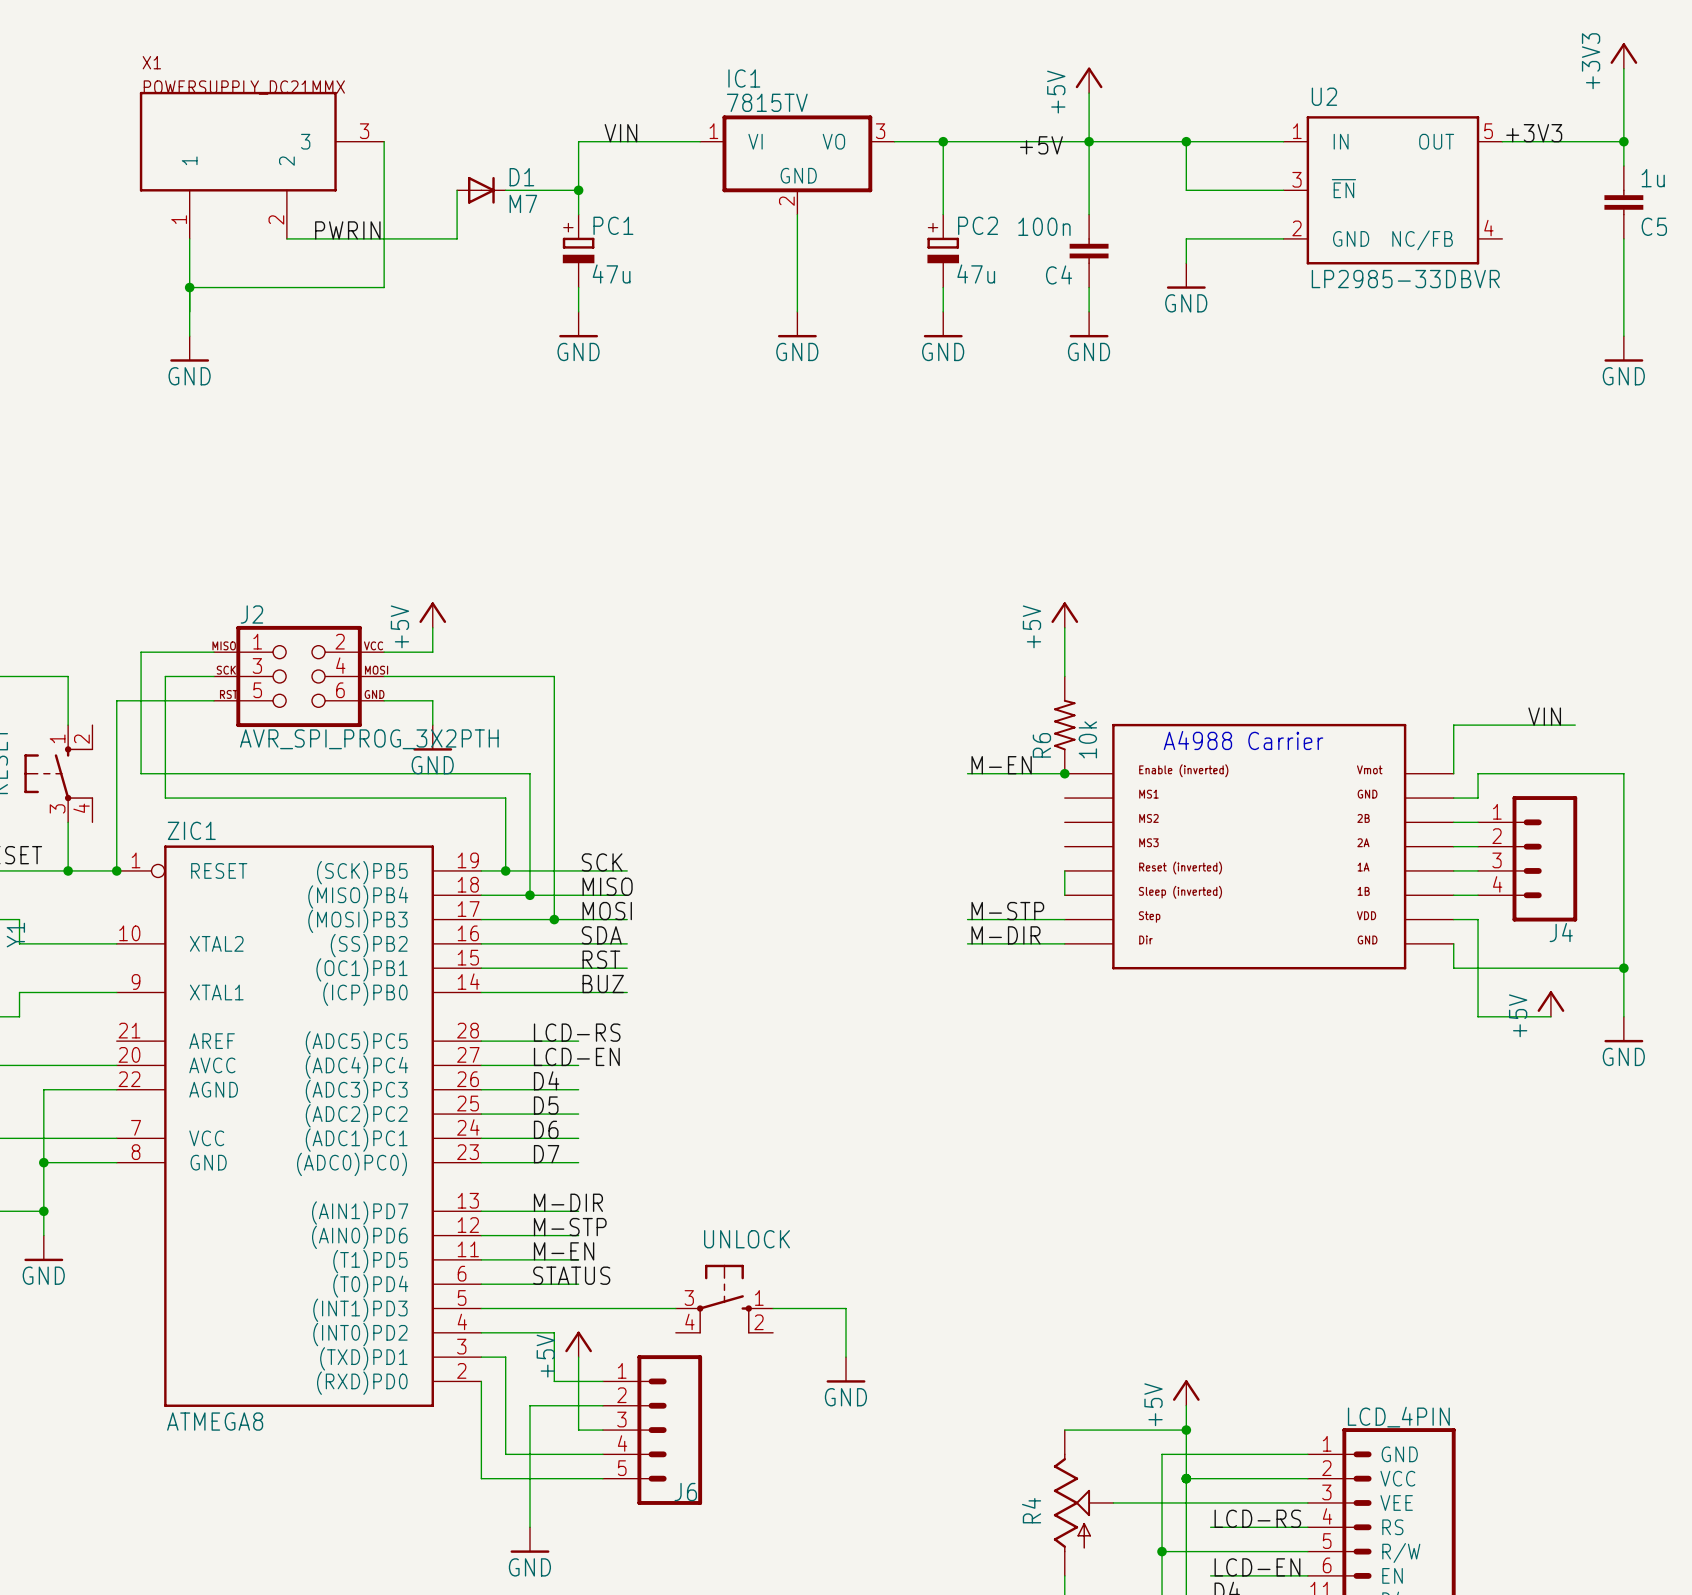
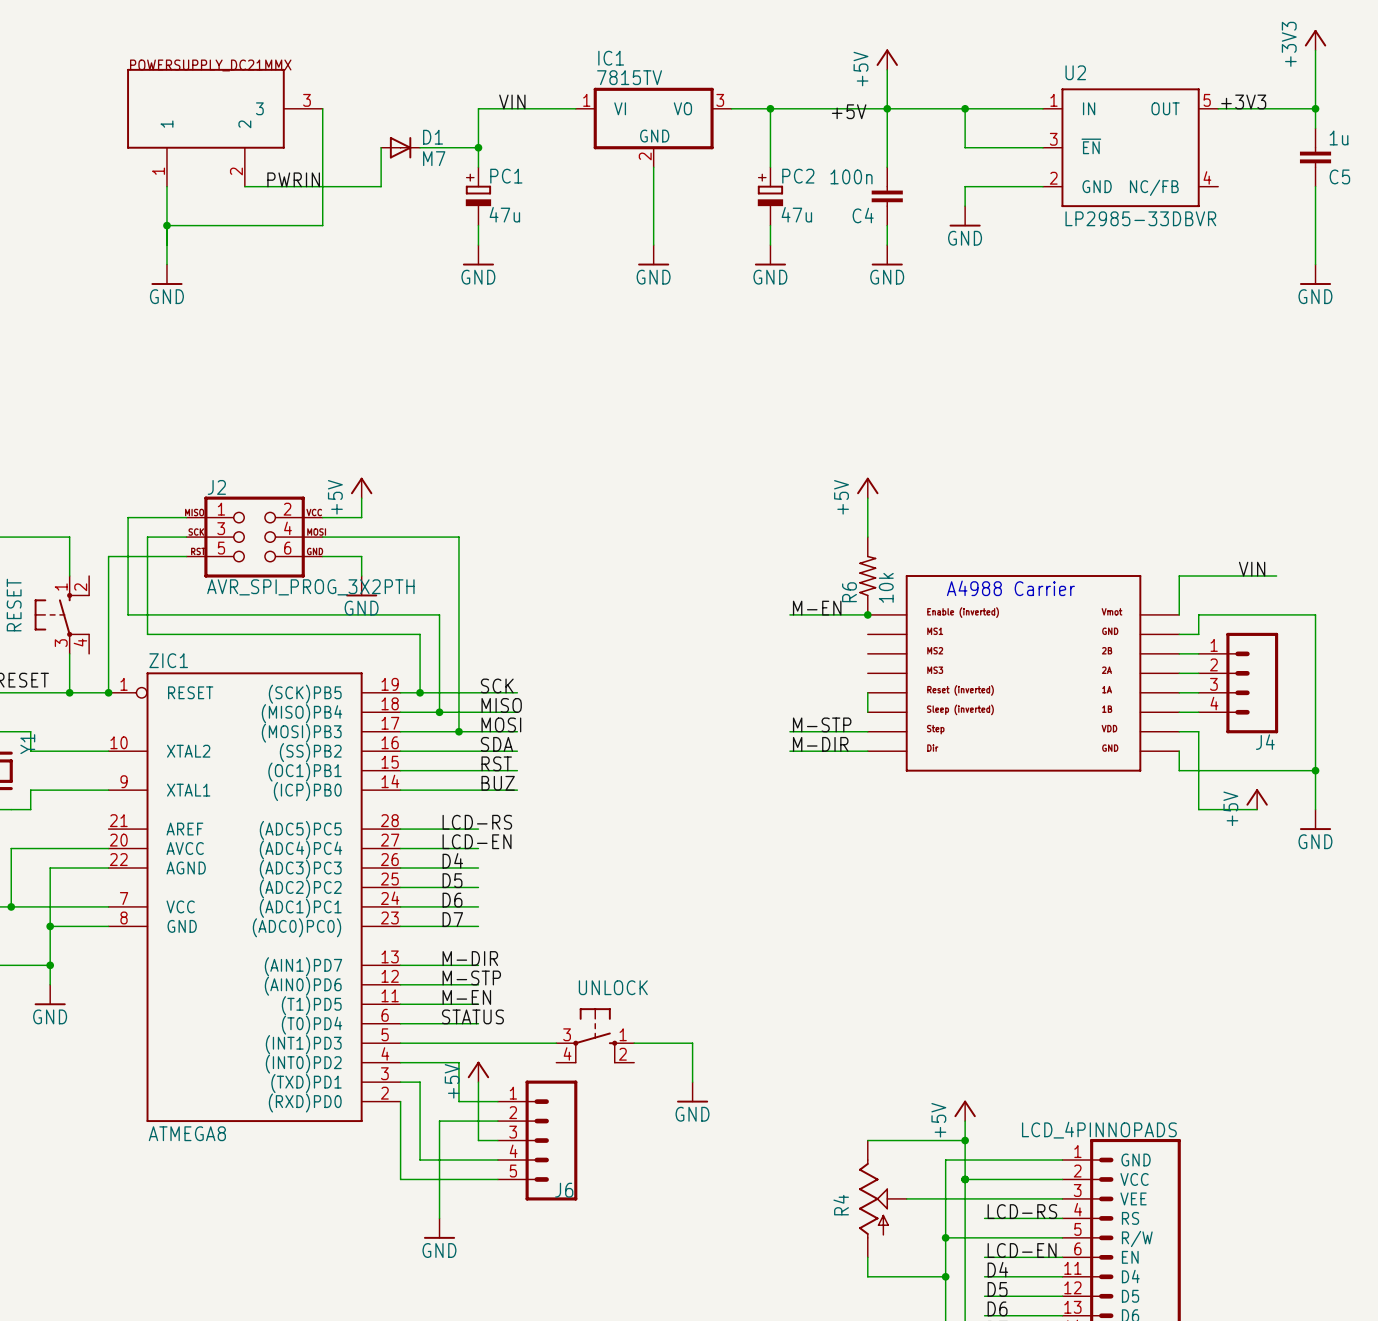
X1 name: X1 (151, 62) -> none
part value: LCD_4PIN (1398, 1417) -> LCD_4PINNOPADS (1099, 1130)

